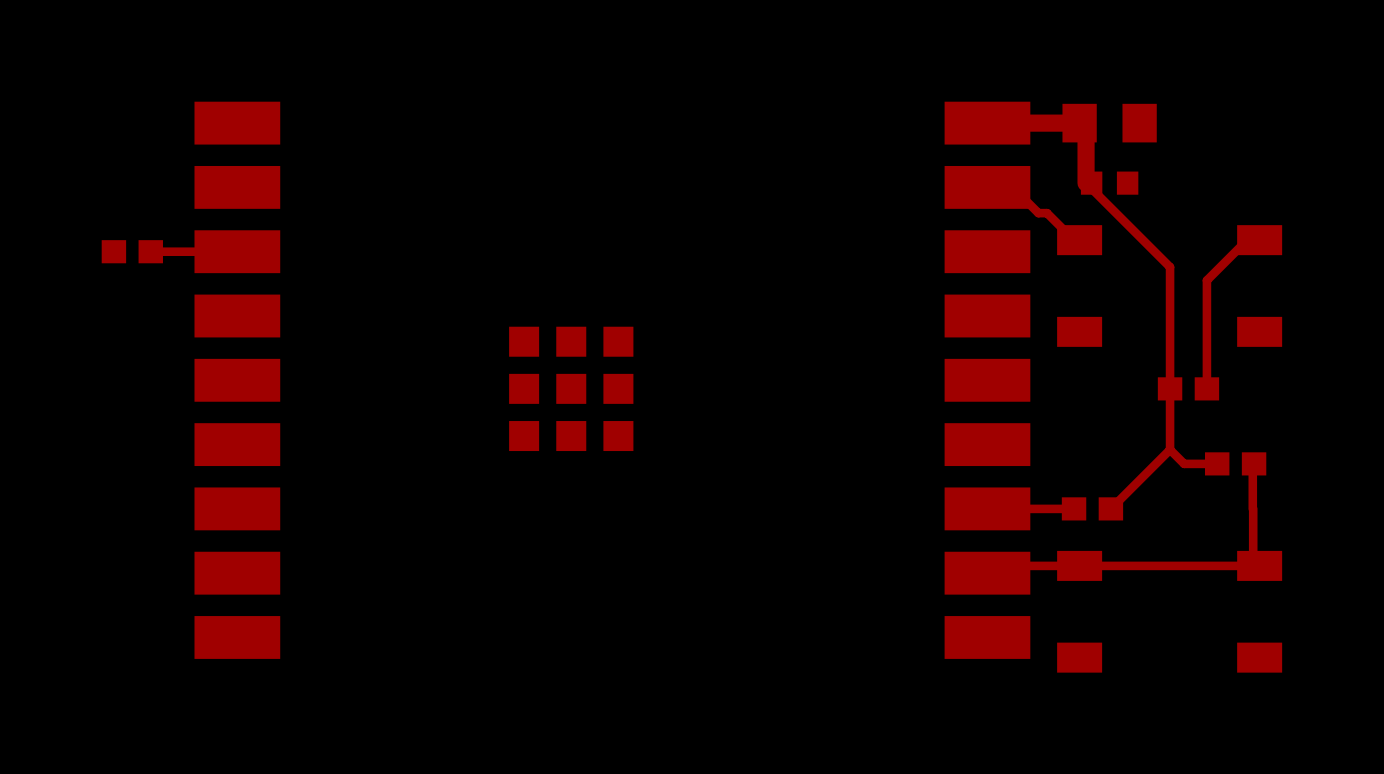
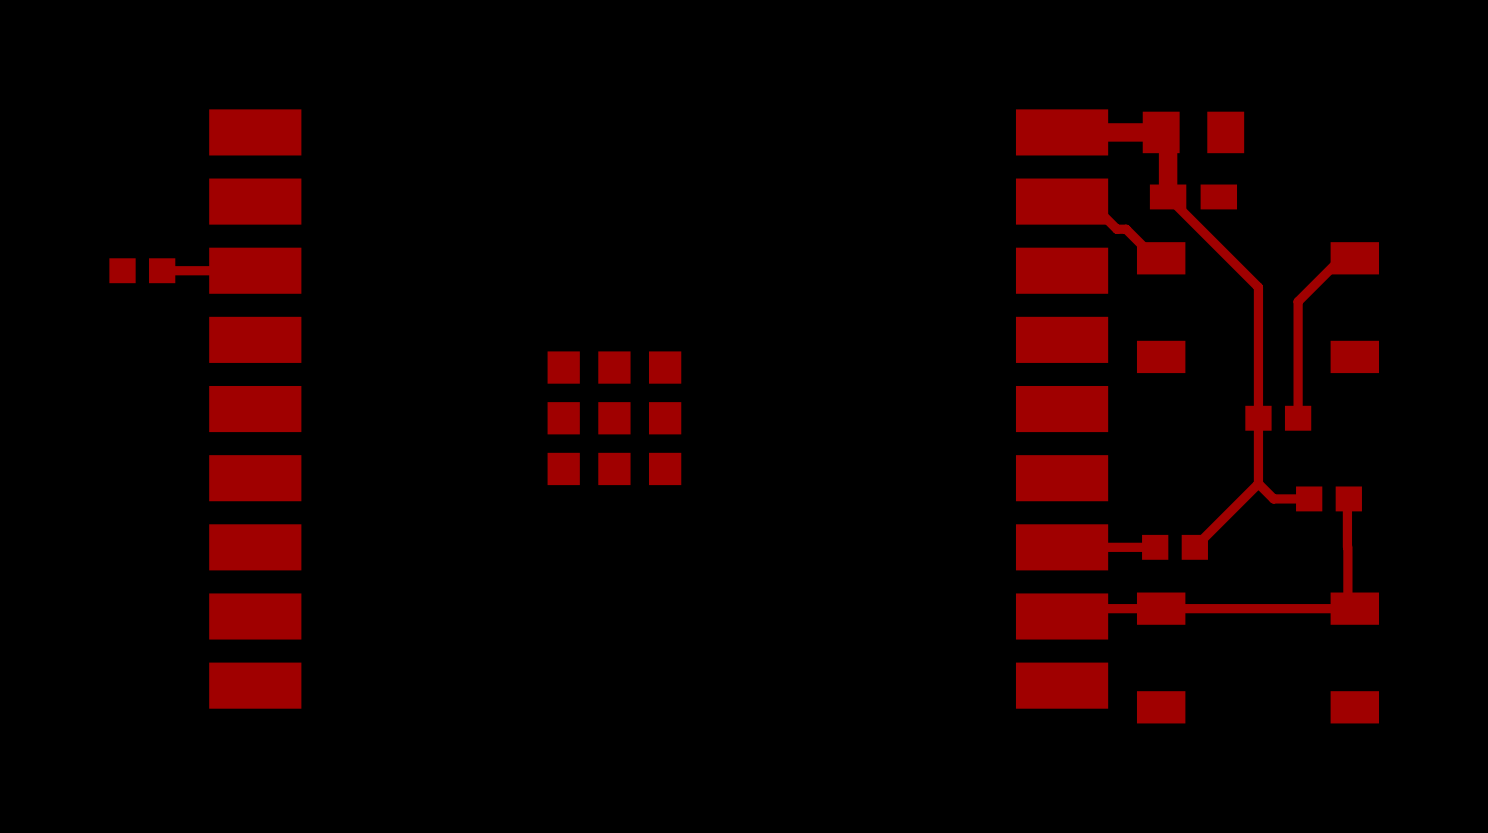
part footprint: [1080, 171, 1139, 195] -> [1149, 184, 1238, 210]

